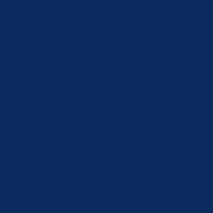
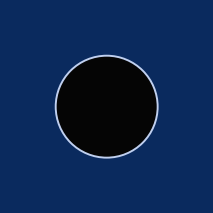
hole: none -> (106, 106)

